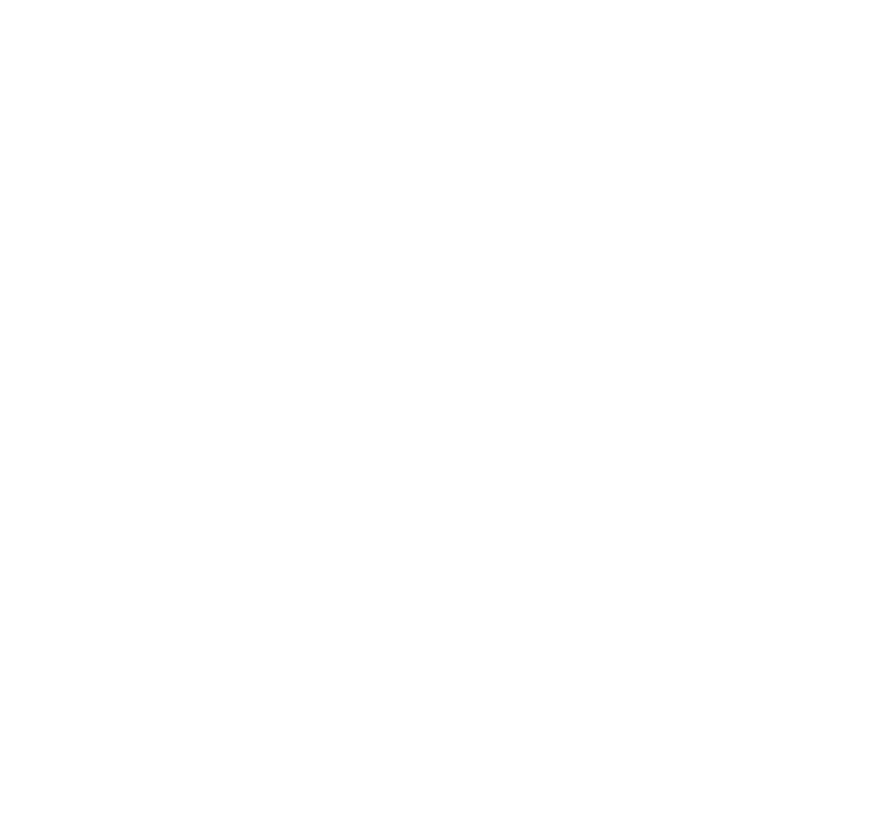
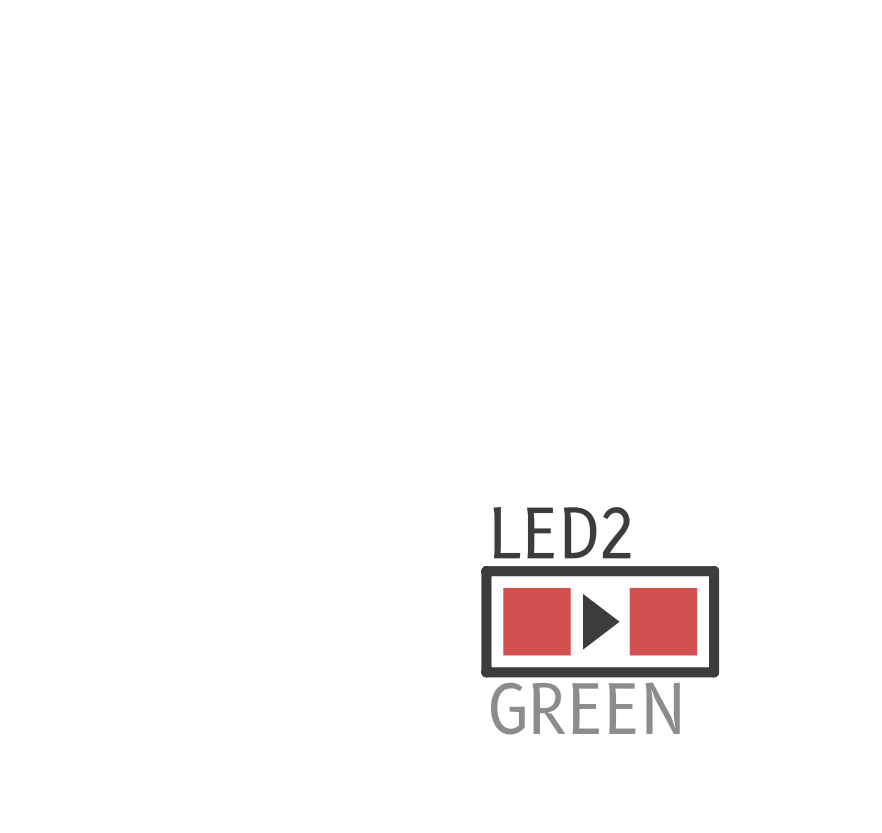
LED2: none -> GREEN (600, 621)

